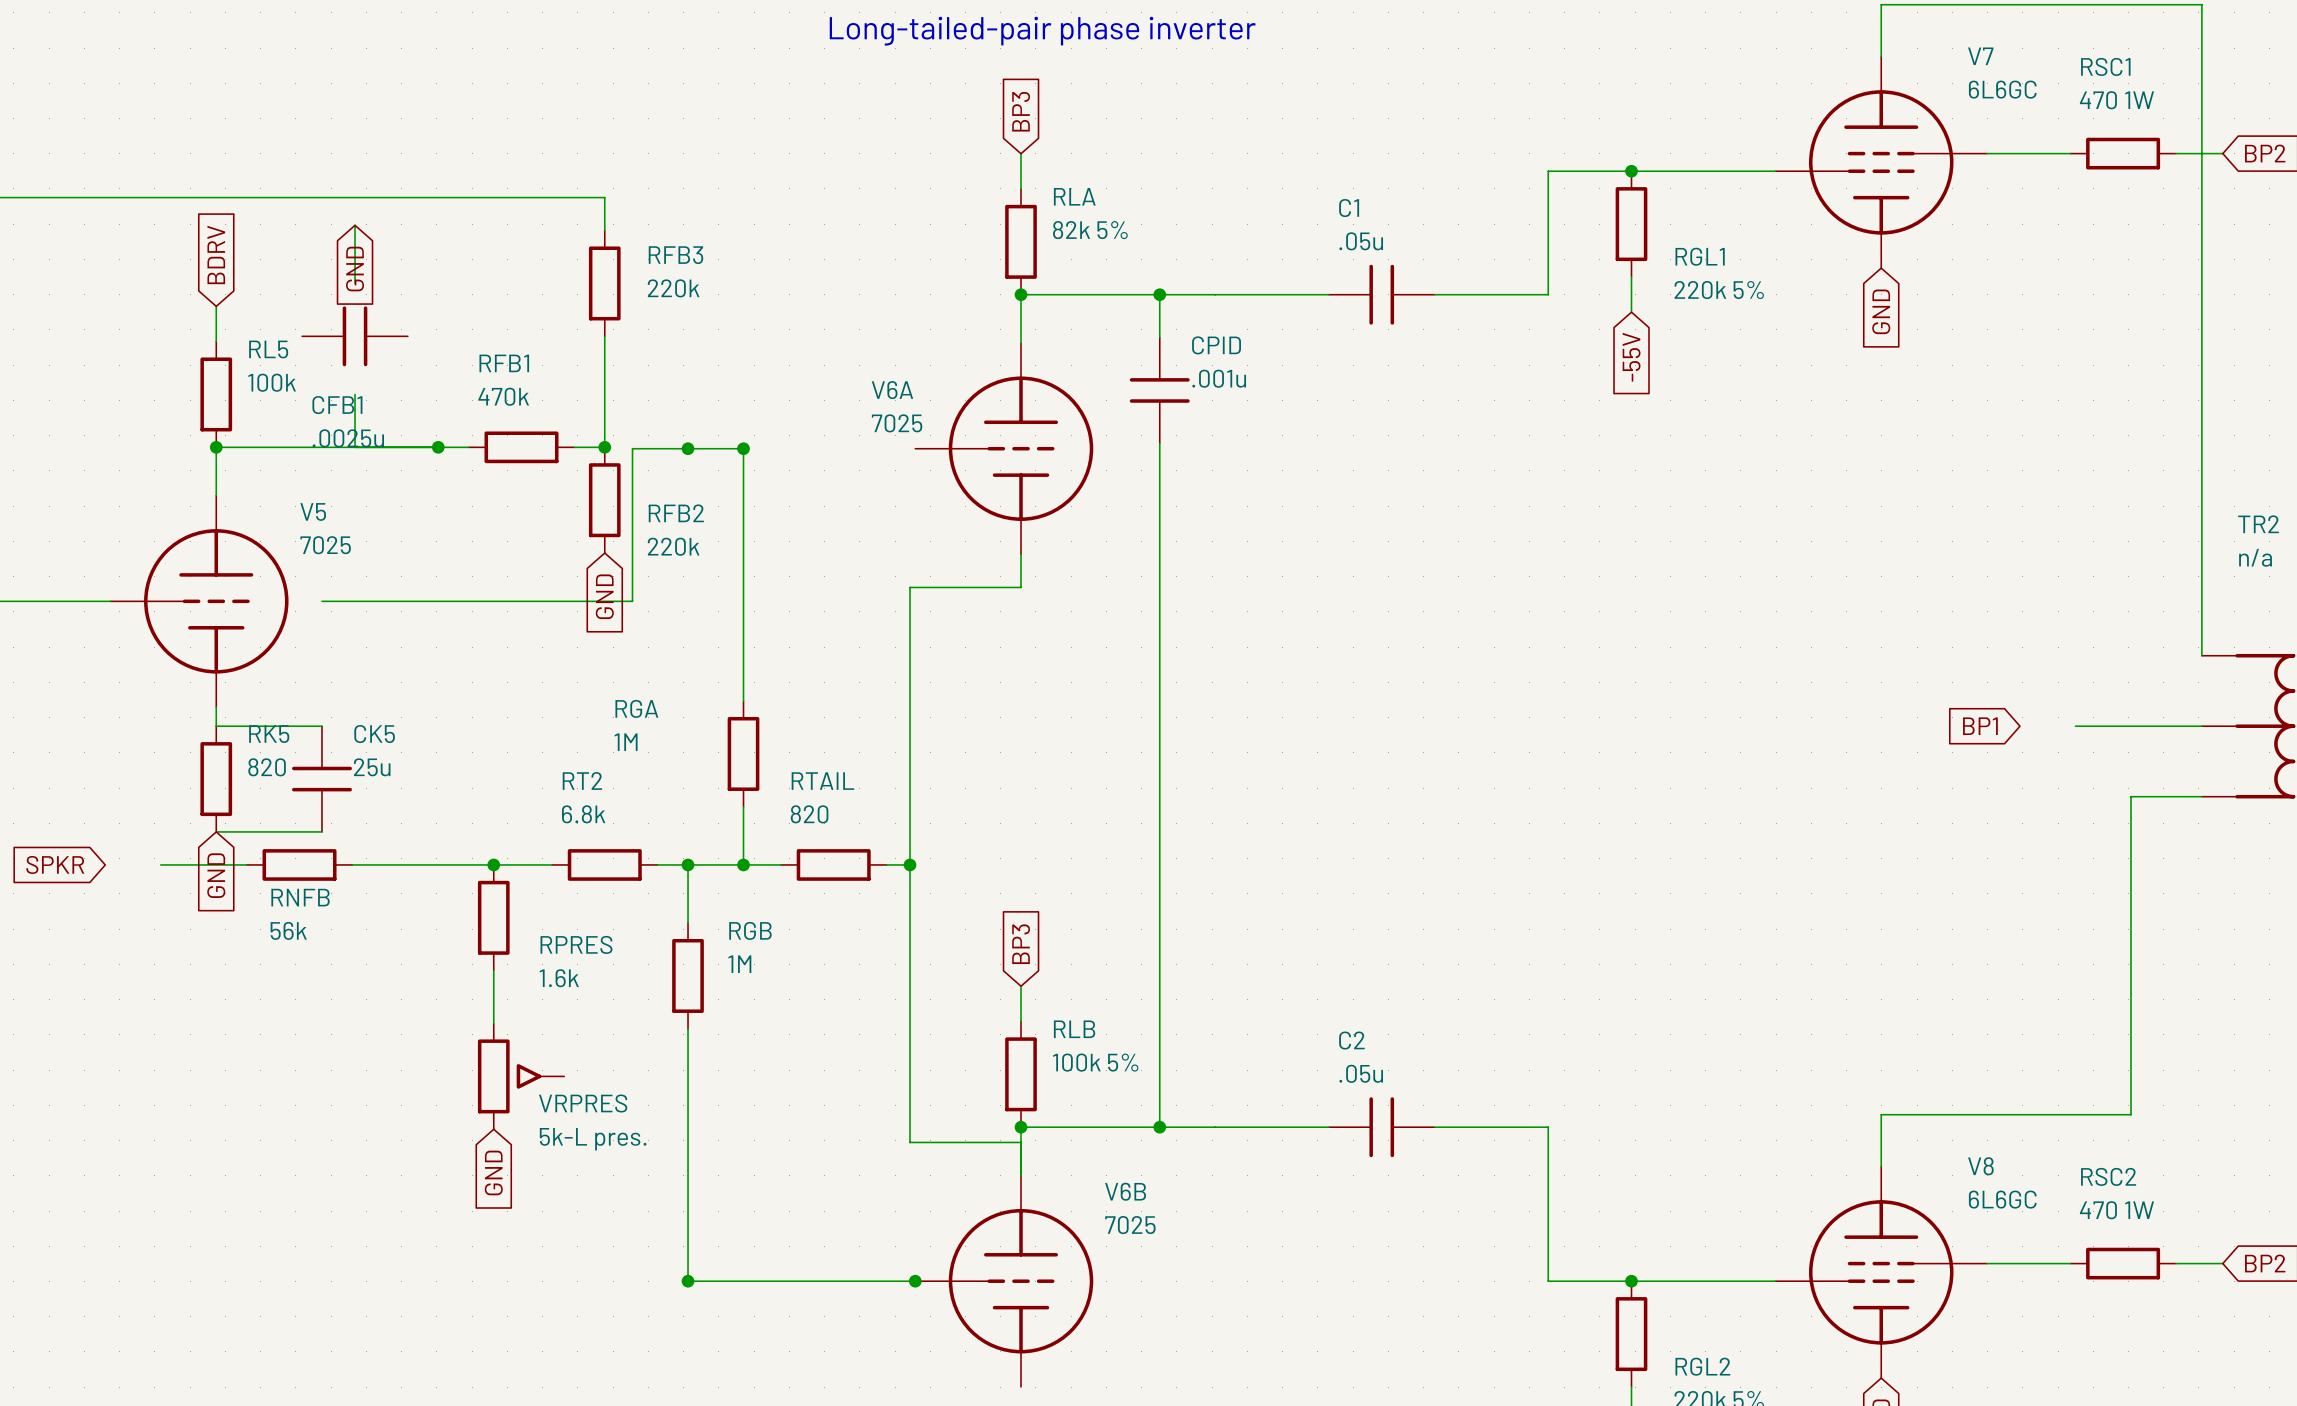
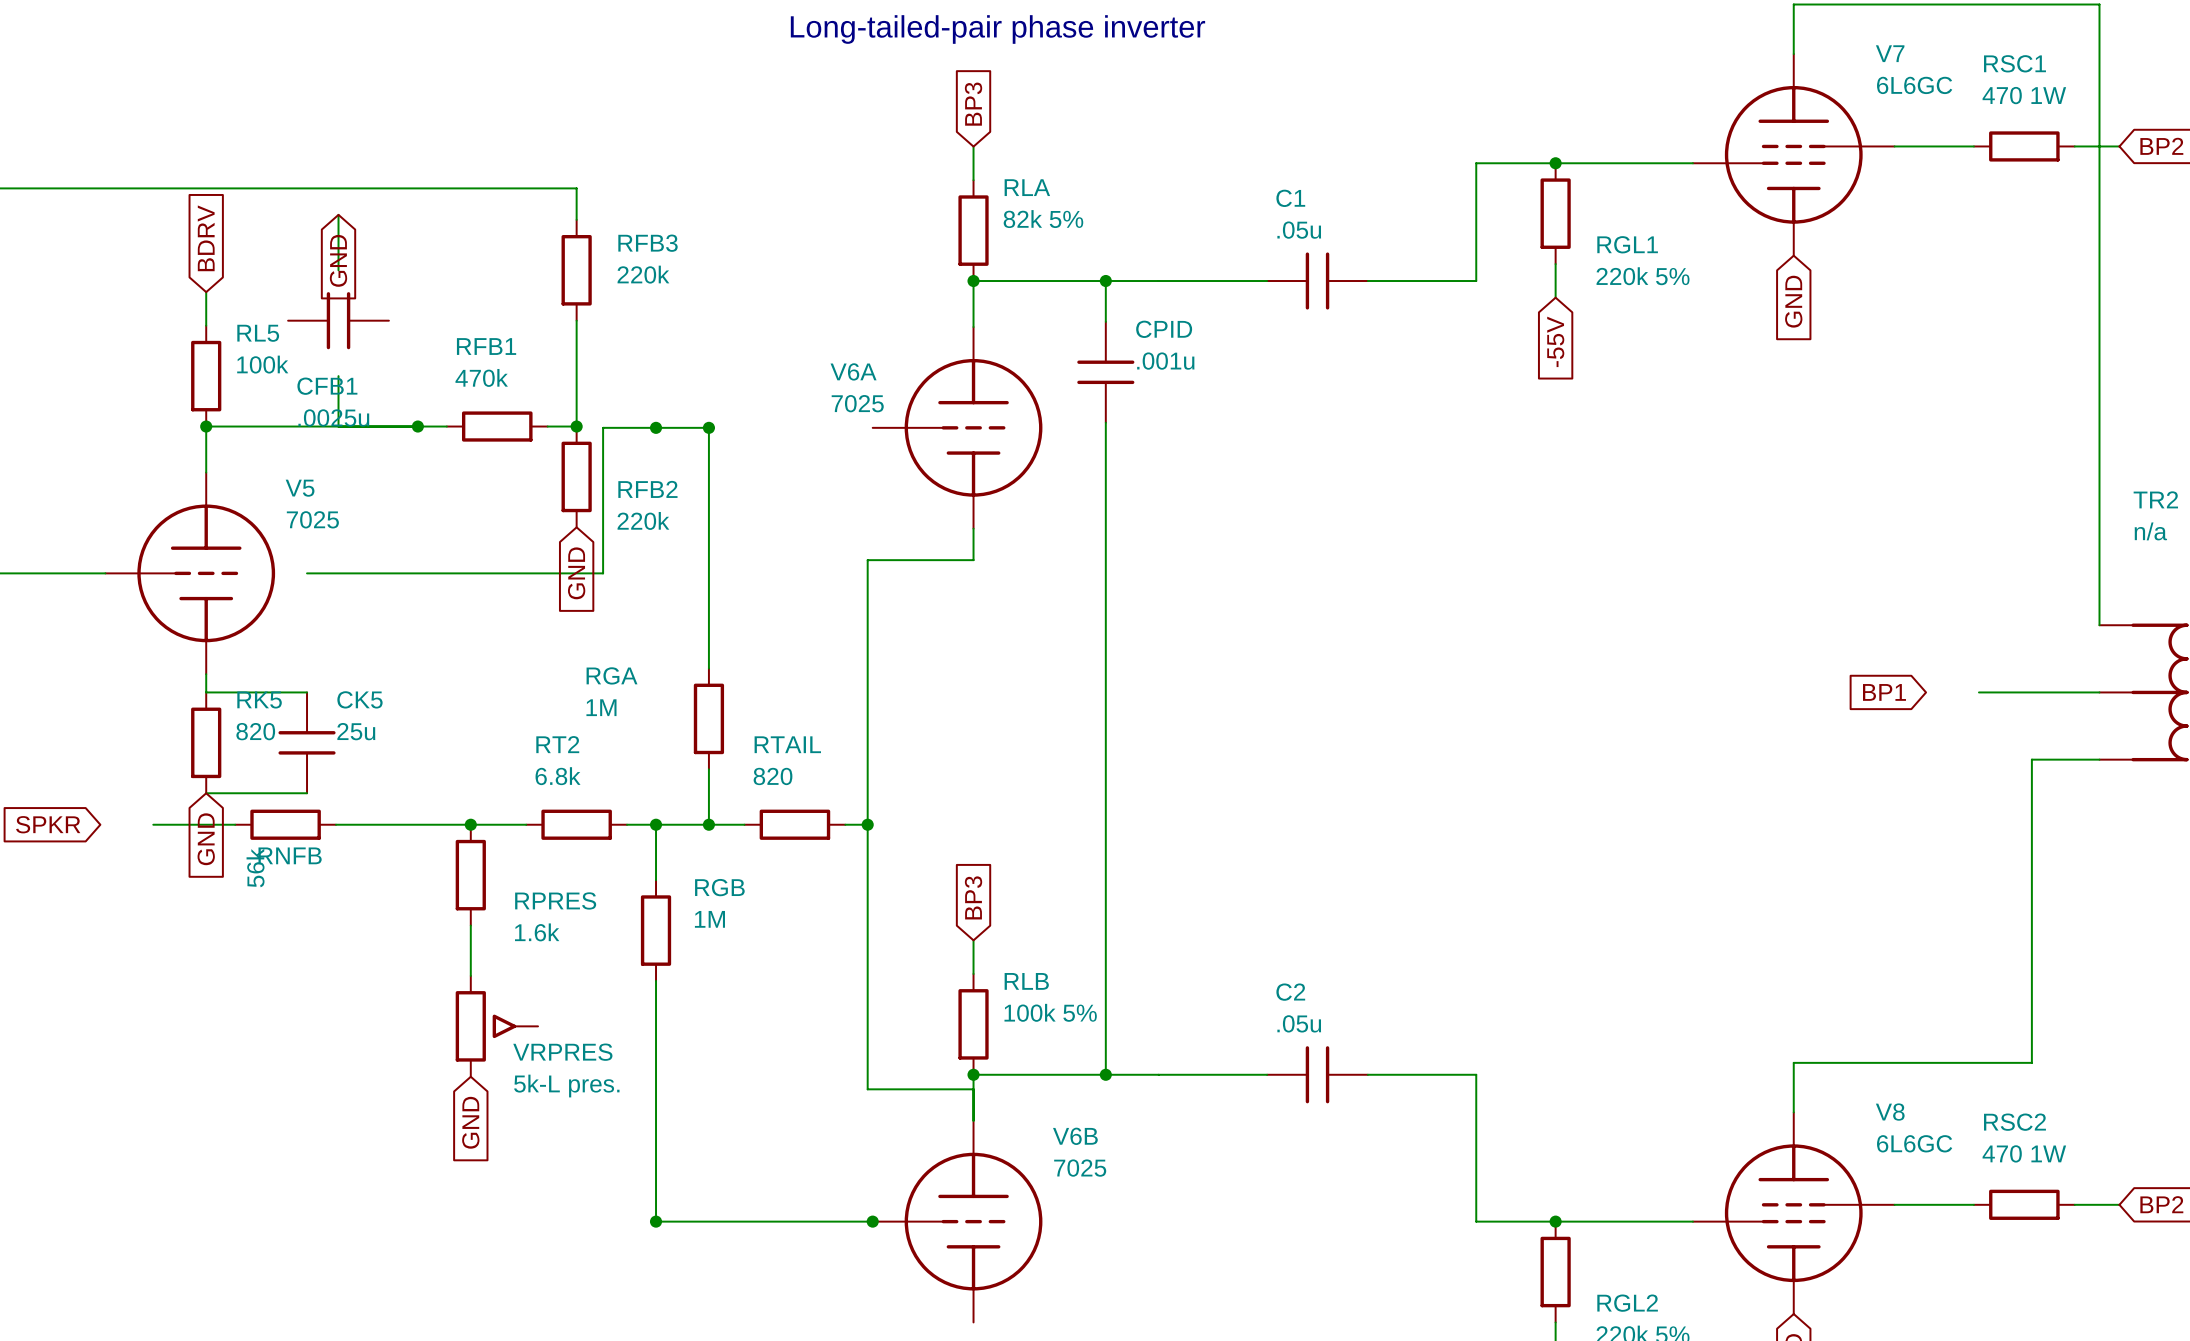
RNFB value rotation: 0° (288, 930) -> 90° counterclockwise (255, 868)

